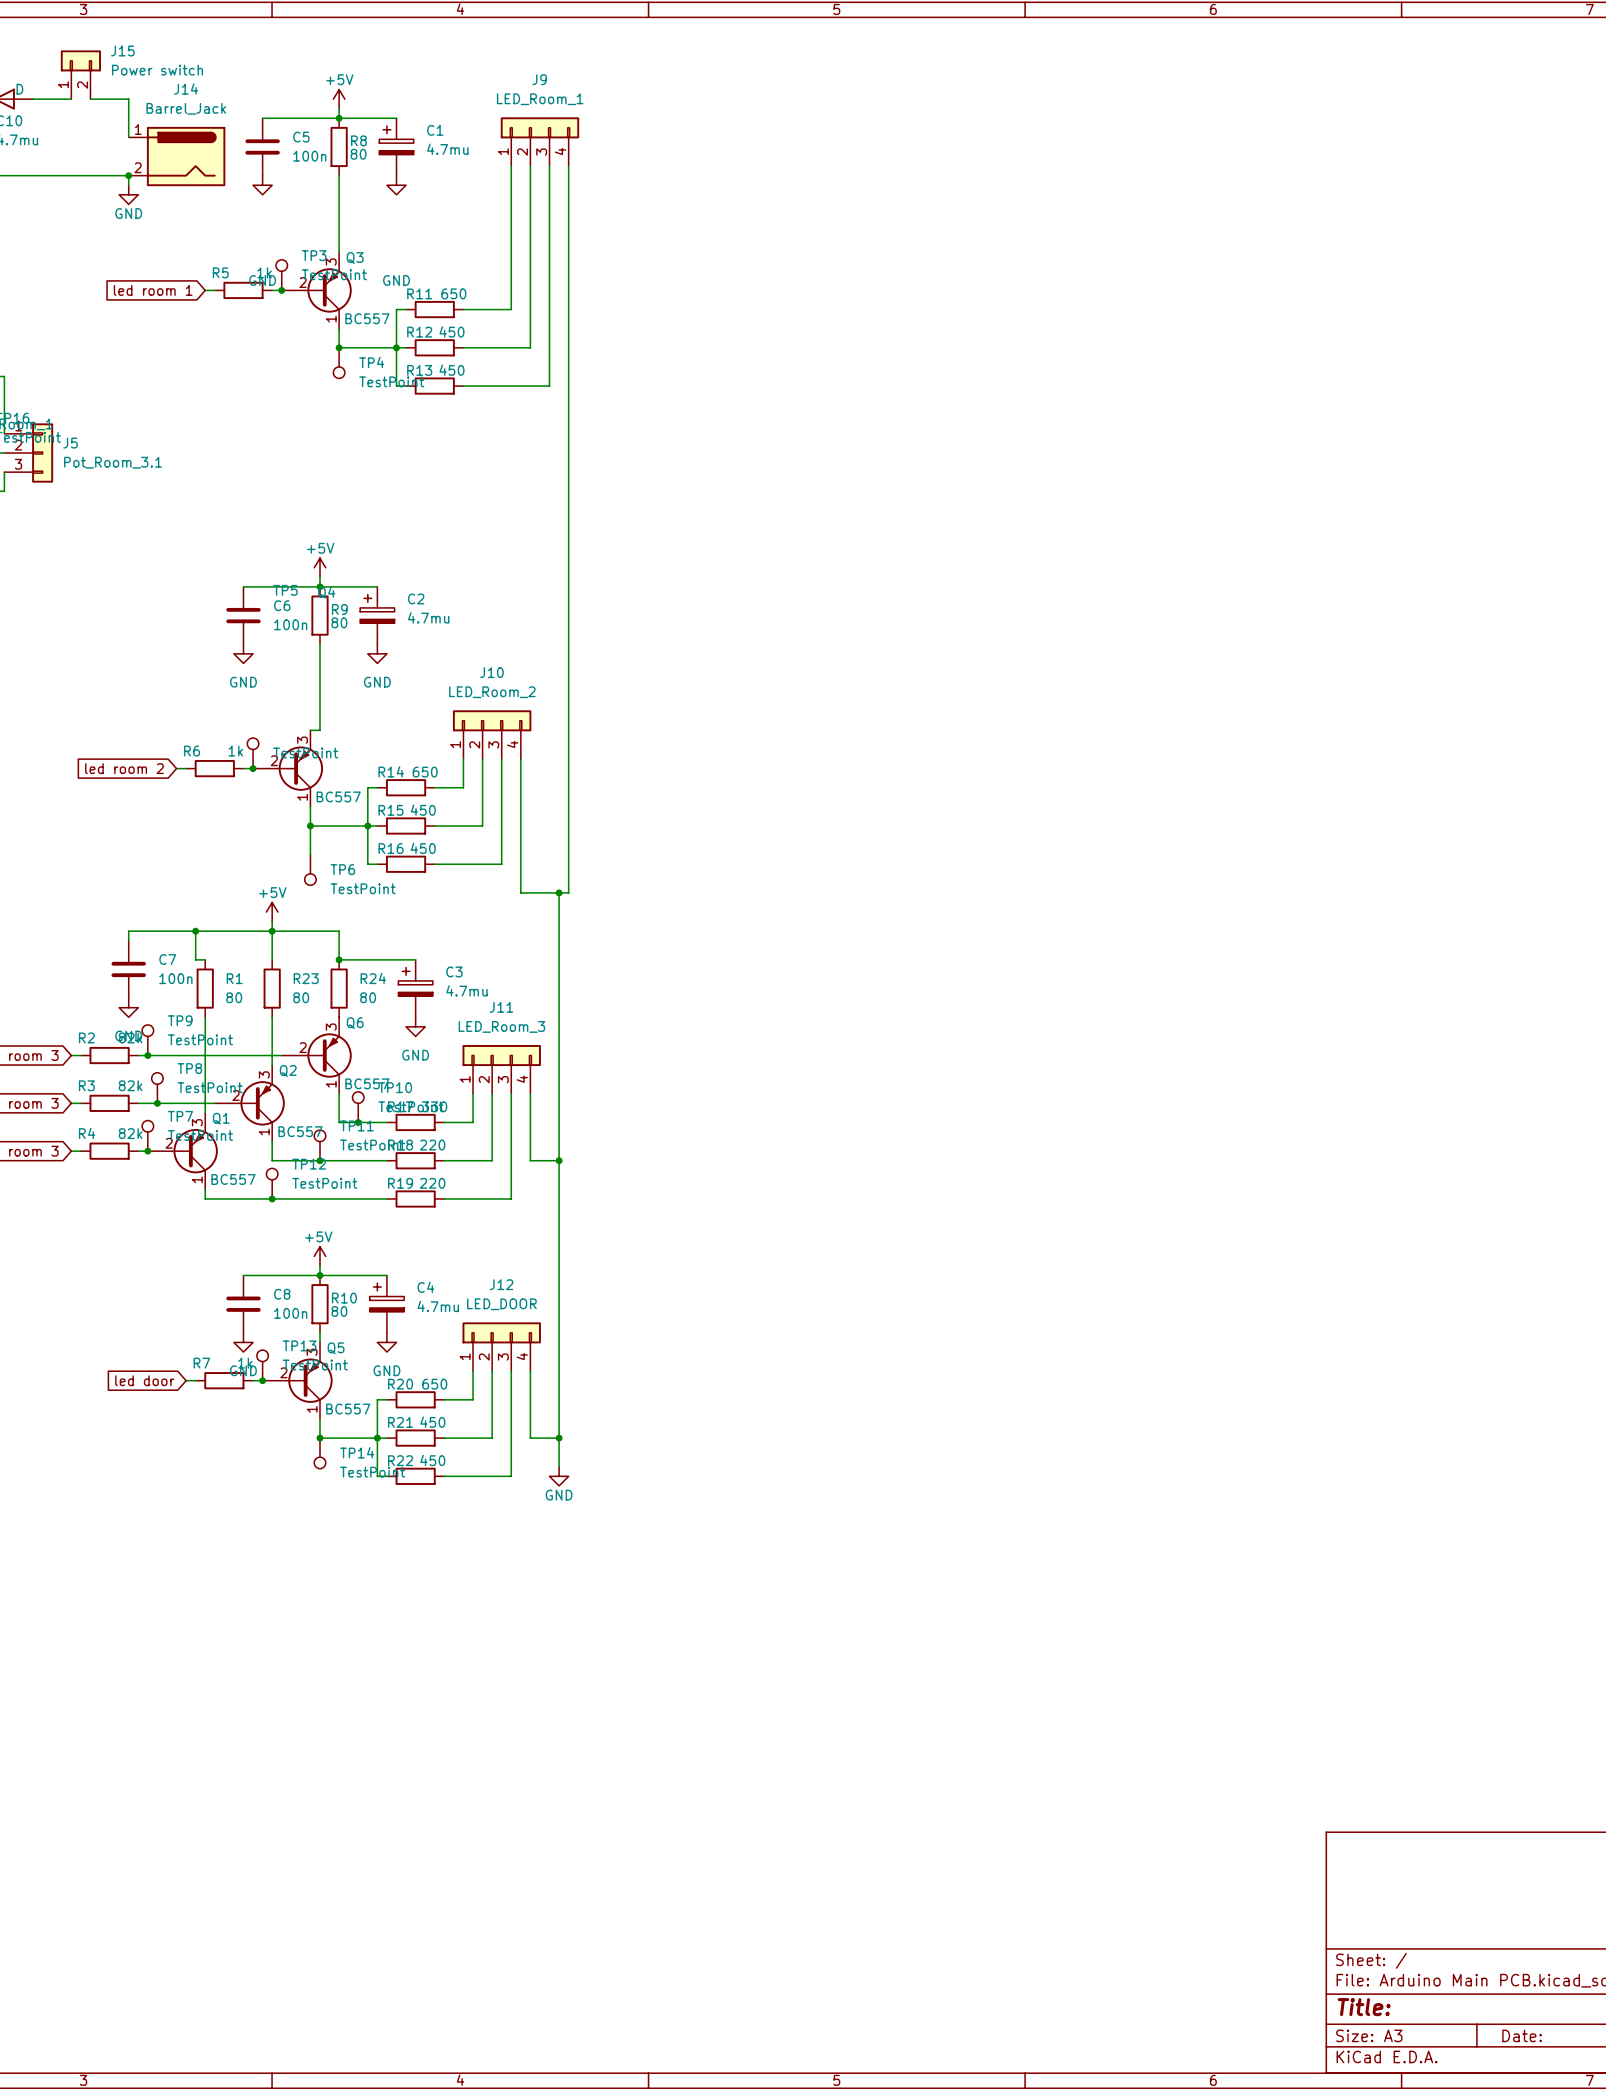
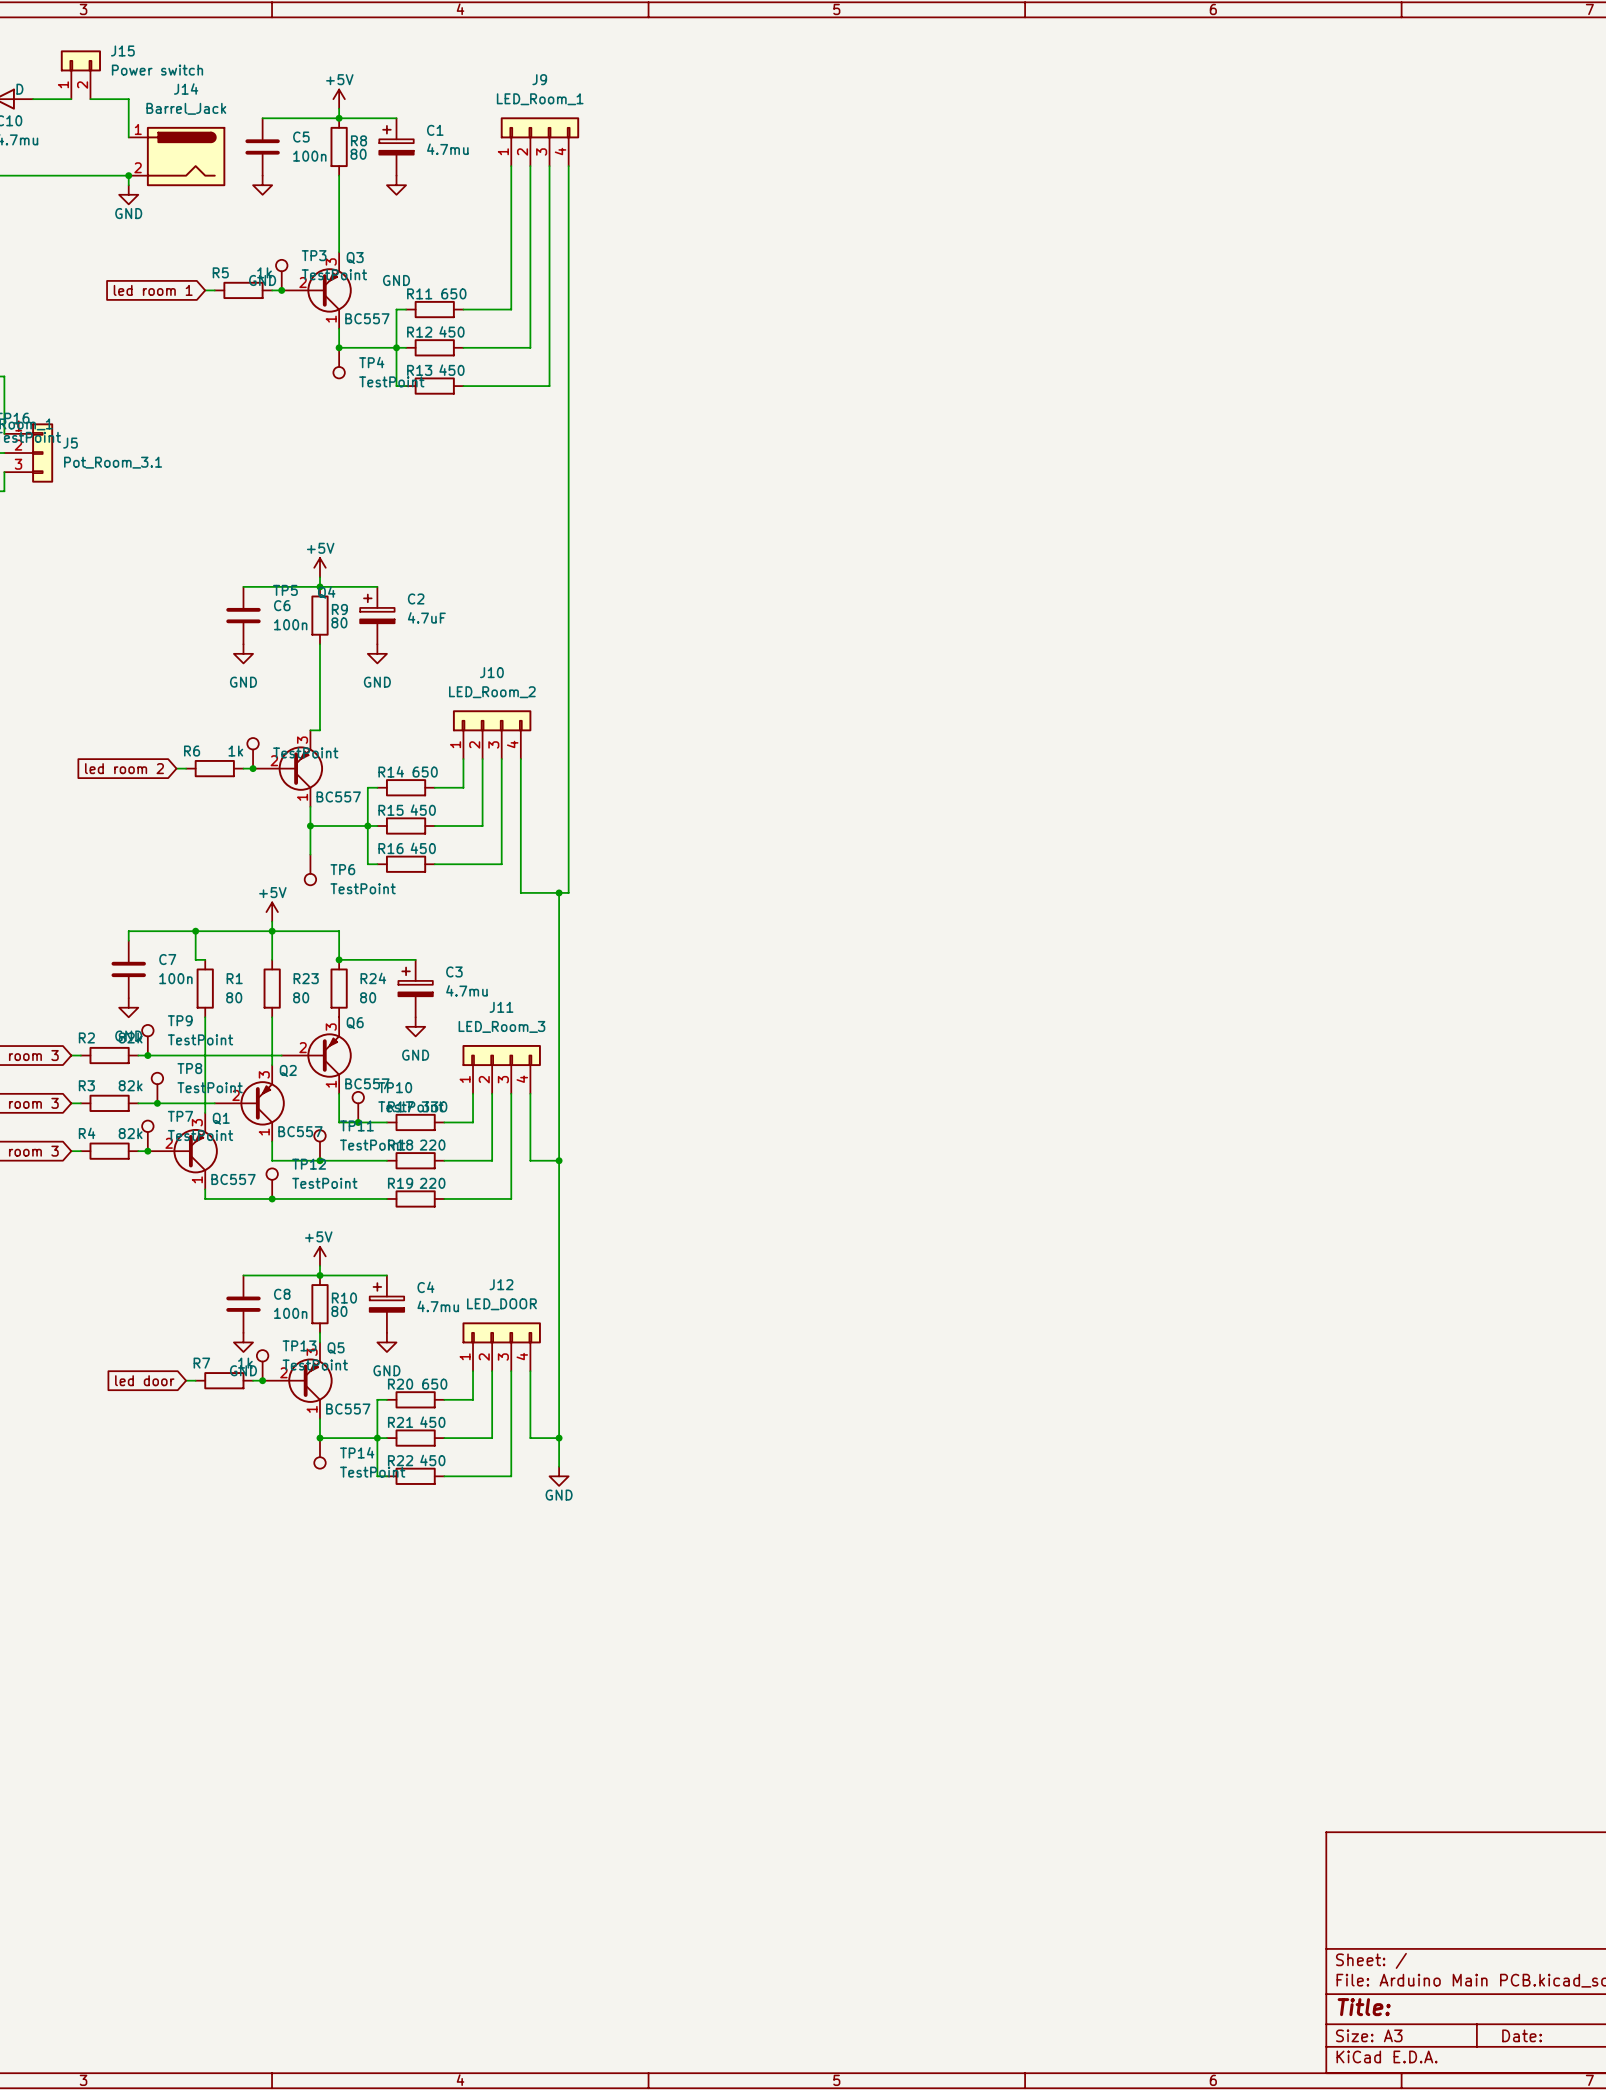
C2 value: 4.7mu (428, 617) -> 4.7uF (426, 617)

